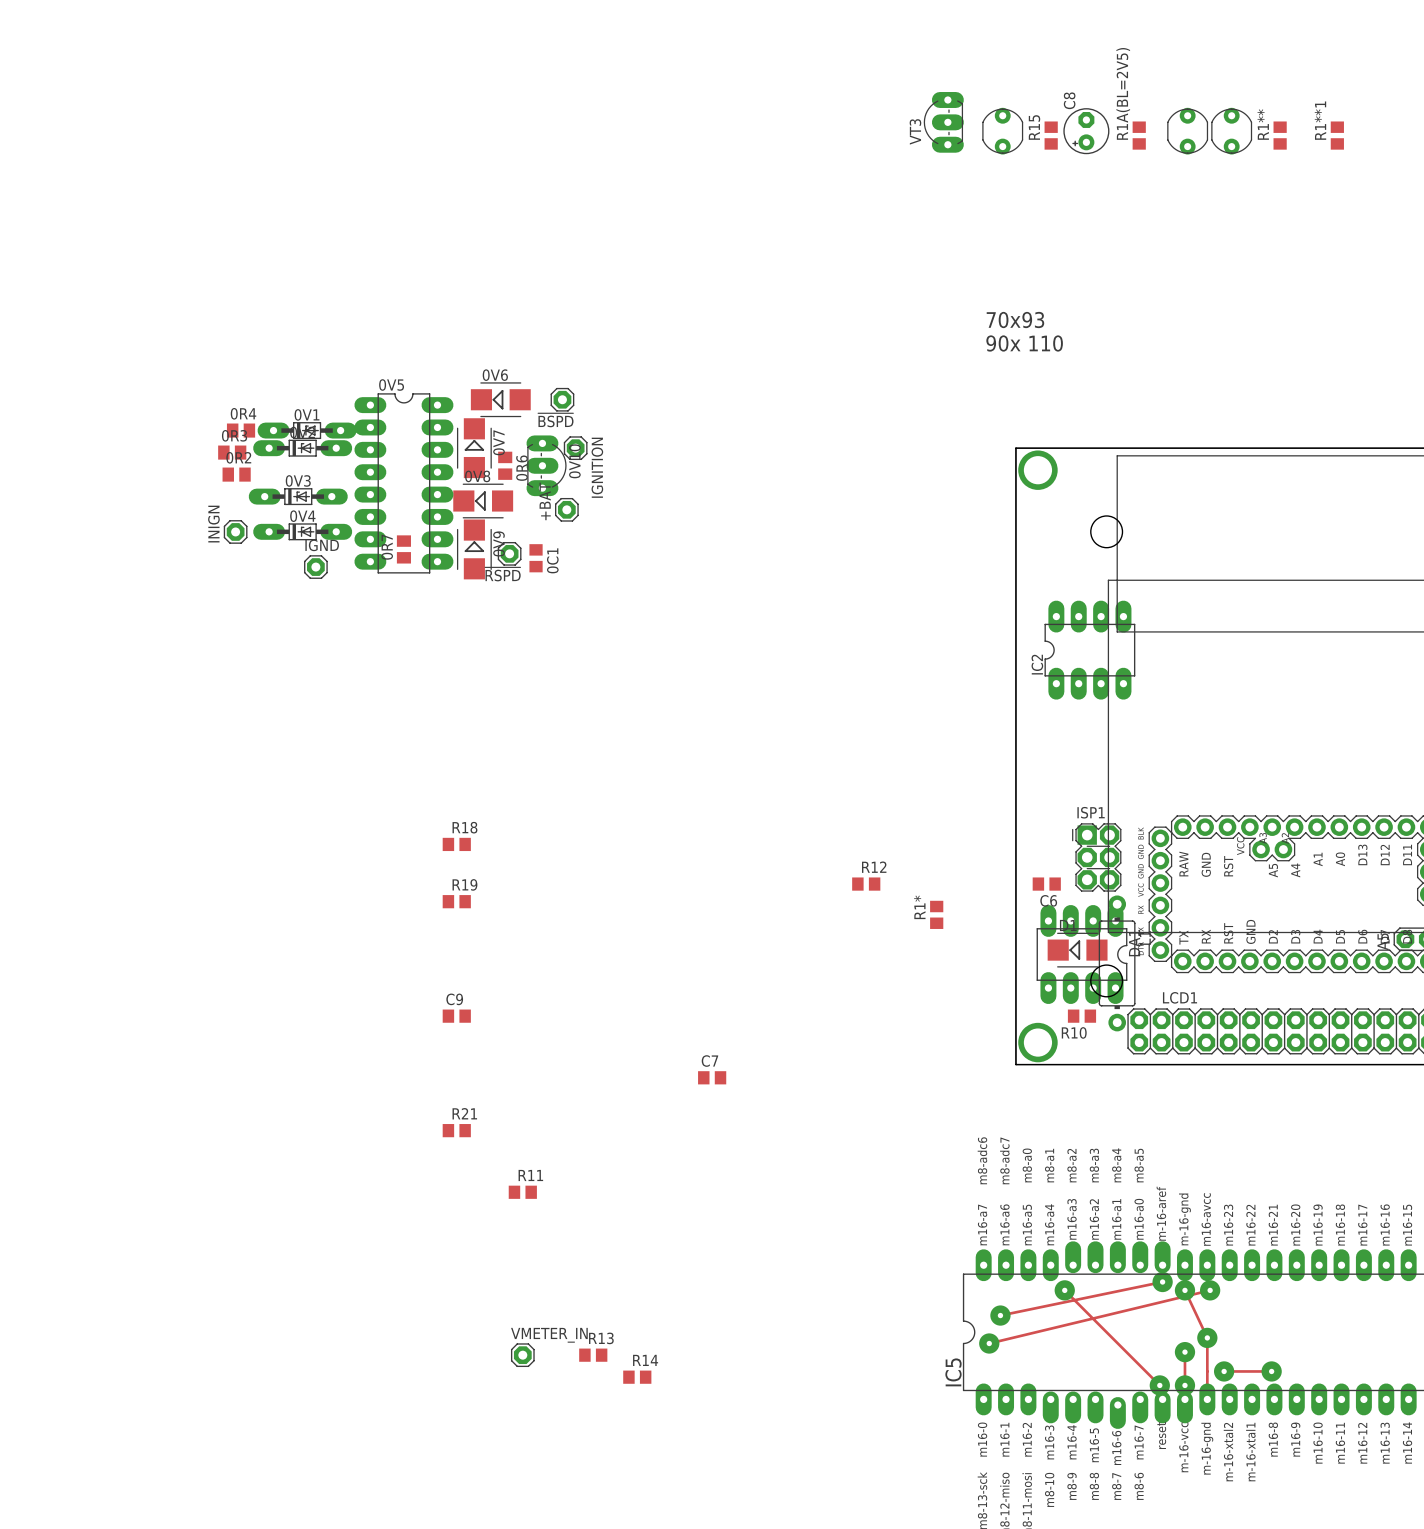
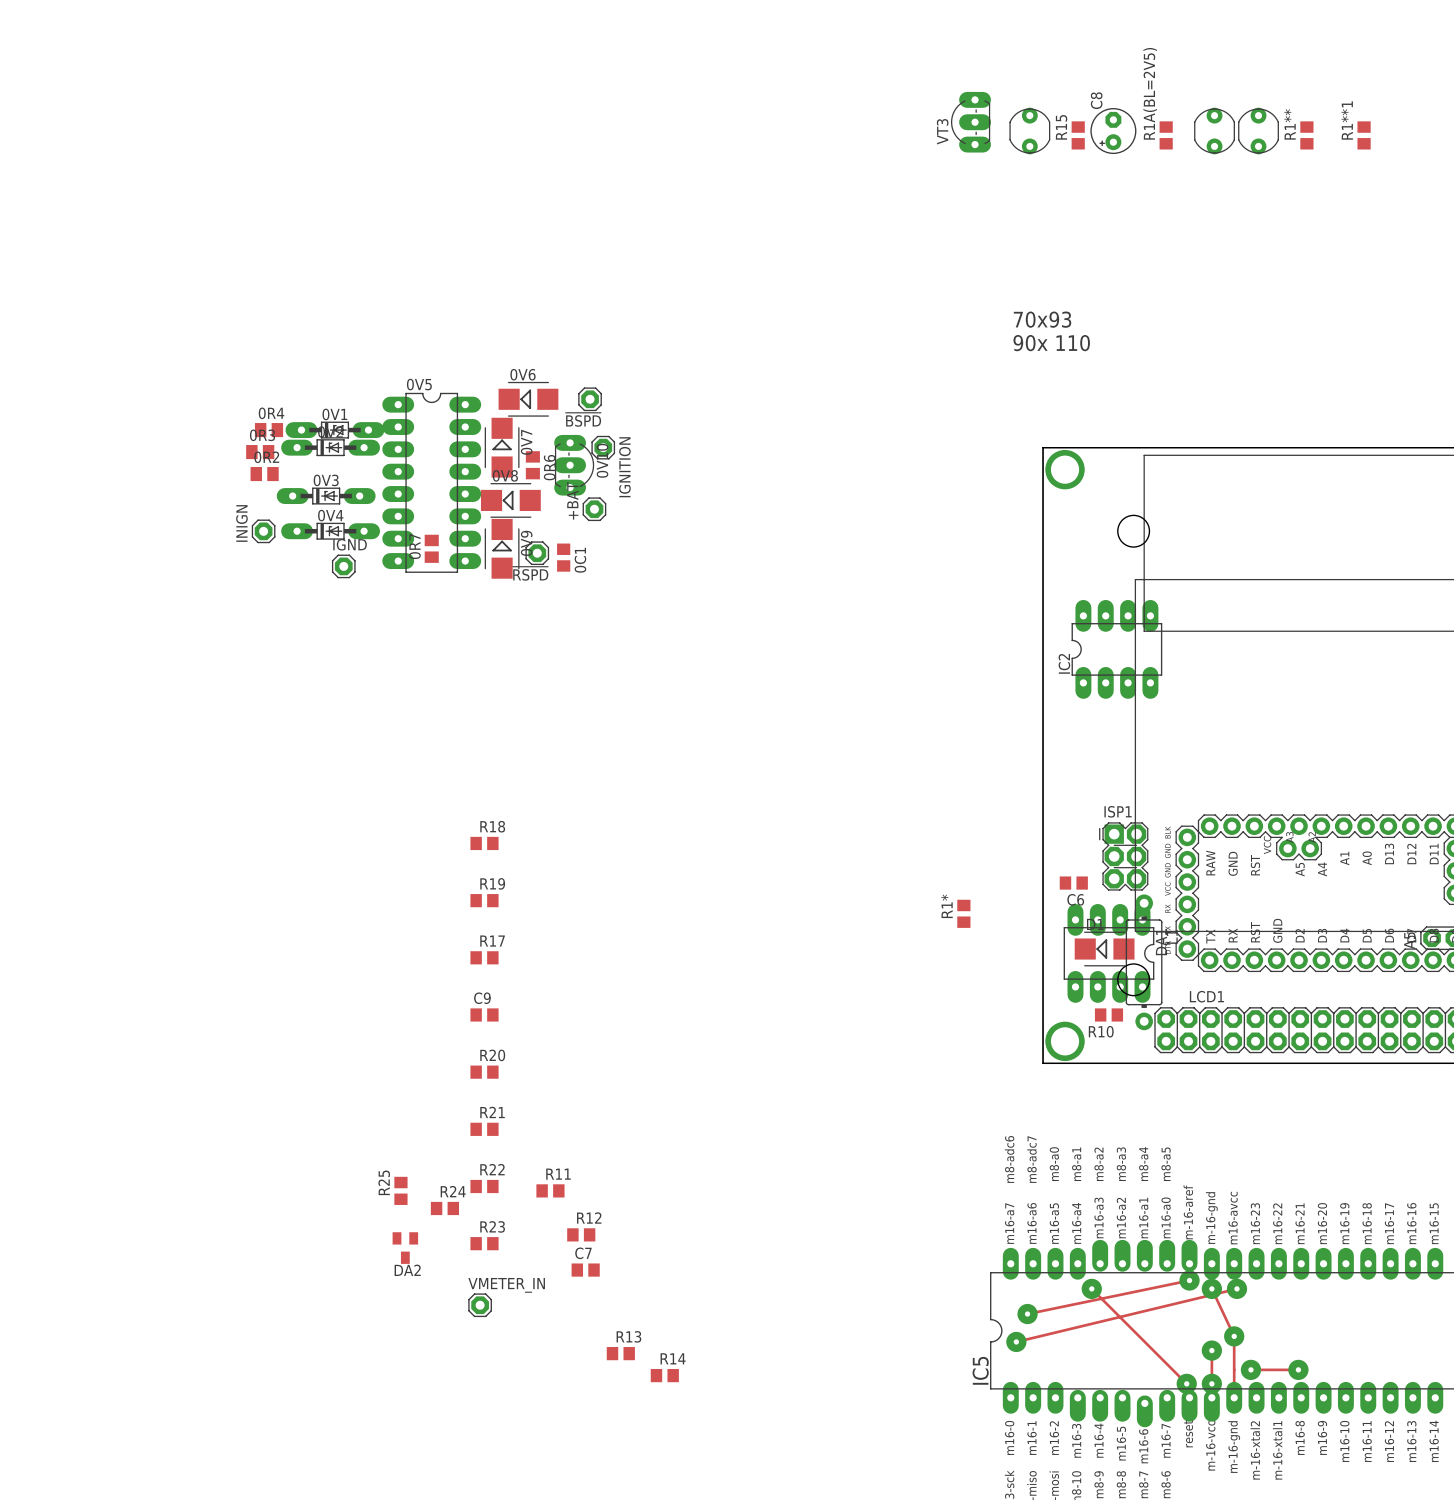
R12 position: (866, 884) -> (581, 1234)
R17: none -> (484, 957)
R20: none -> (484, 1072)
C7 position: (712, 1077) -> (585, 1270)
R22: none -> (484, 1186)
R25: none -> (400, 1190)
R24: none -> (444, 1208)
R23: none -> (484, 1243)
DA2: none -> (405, 1248)
VMETER_IN position: (522, 1355) -> (480, 1305)

